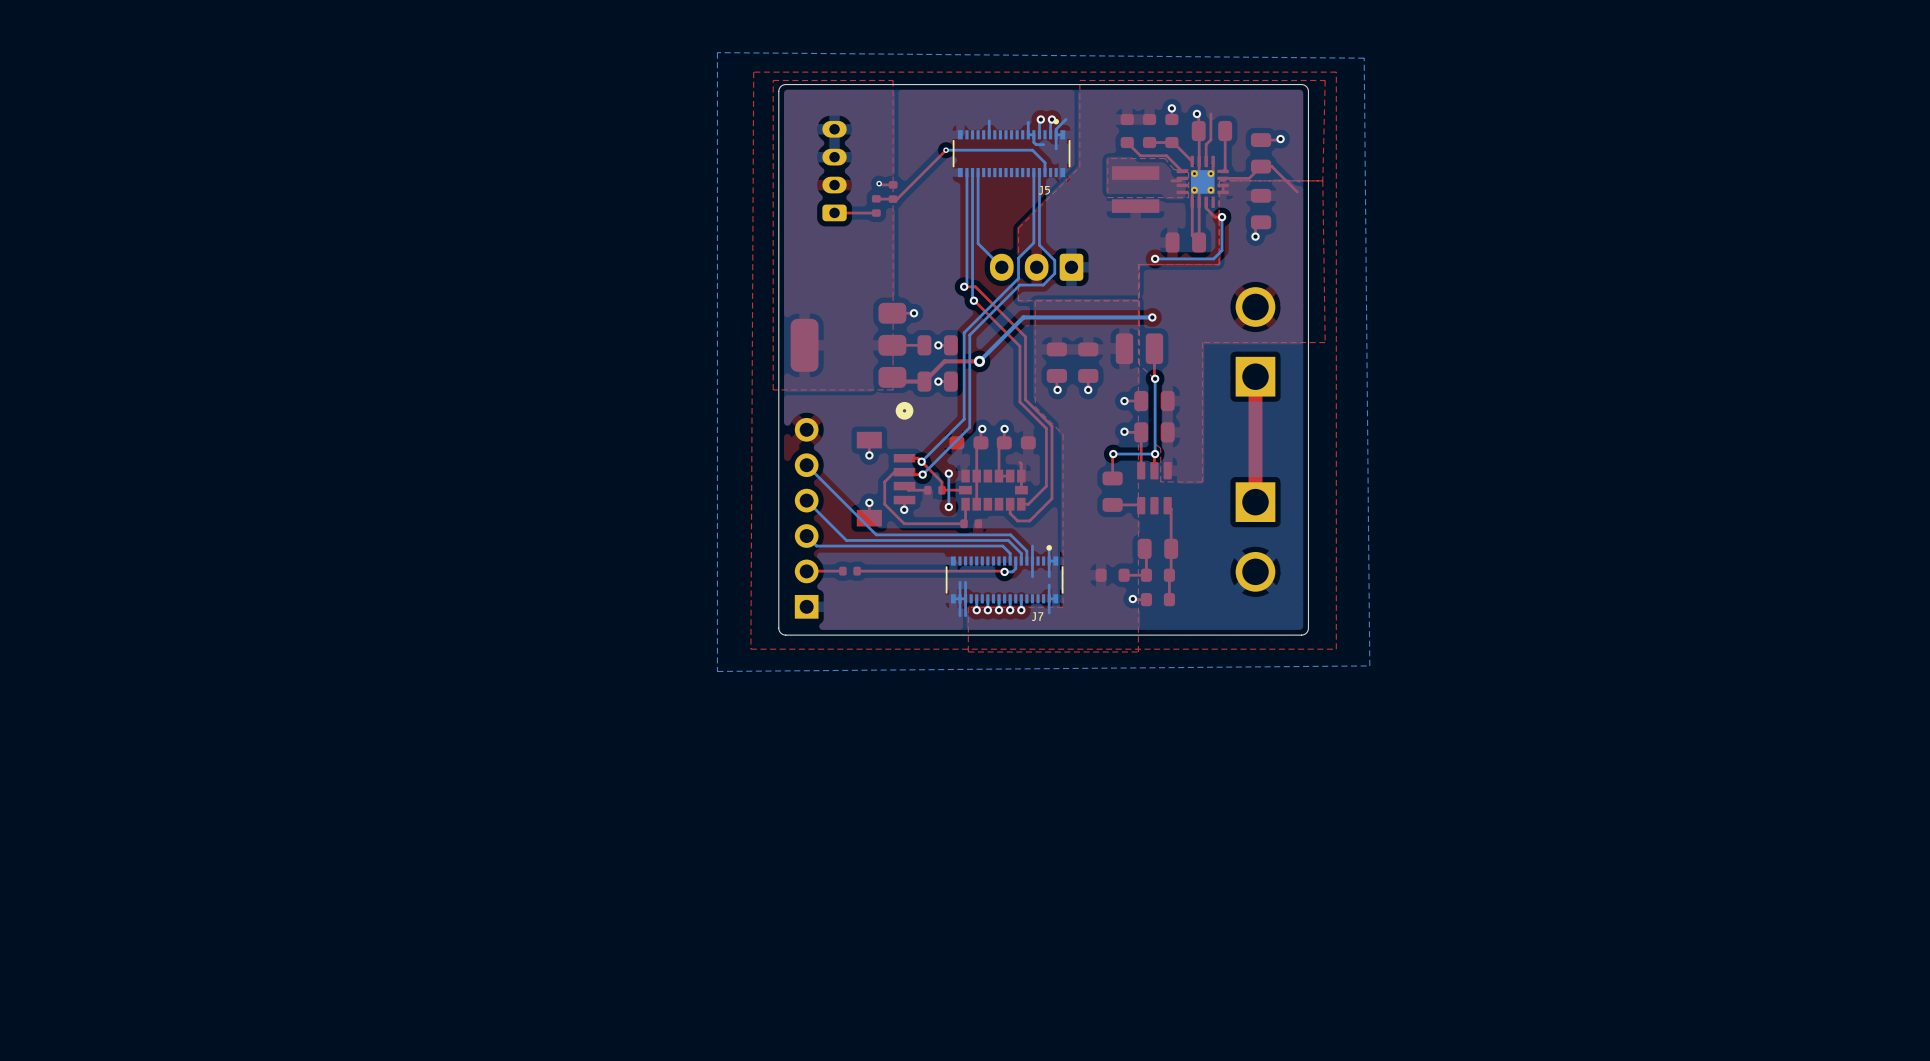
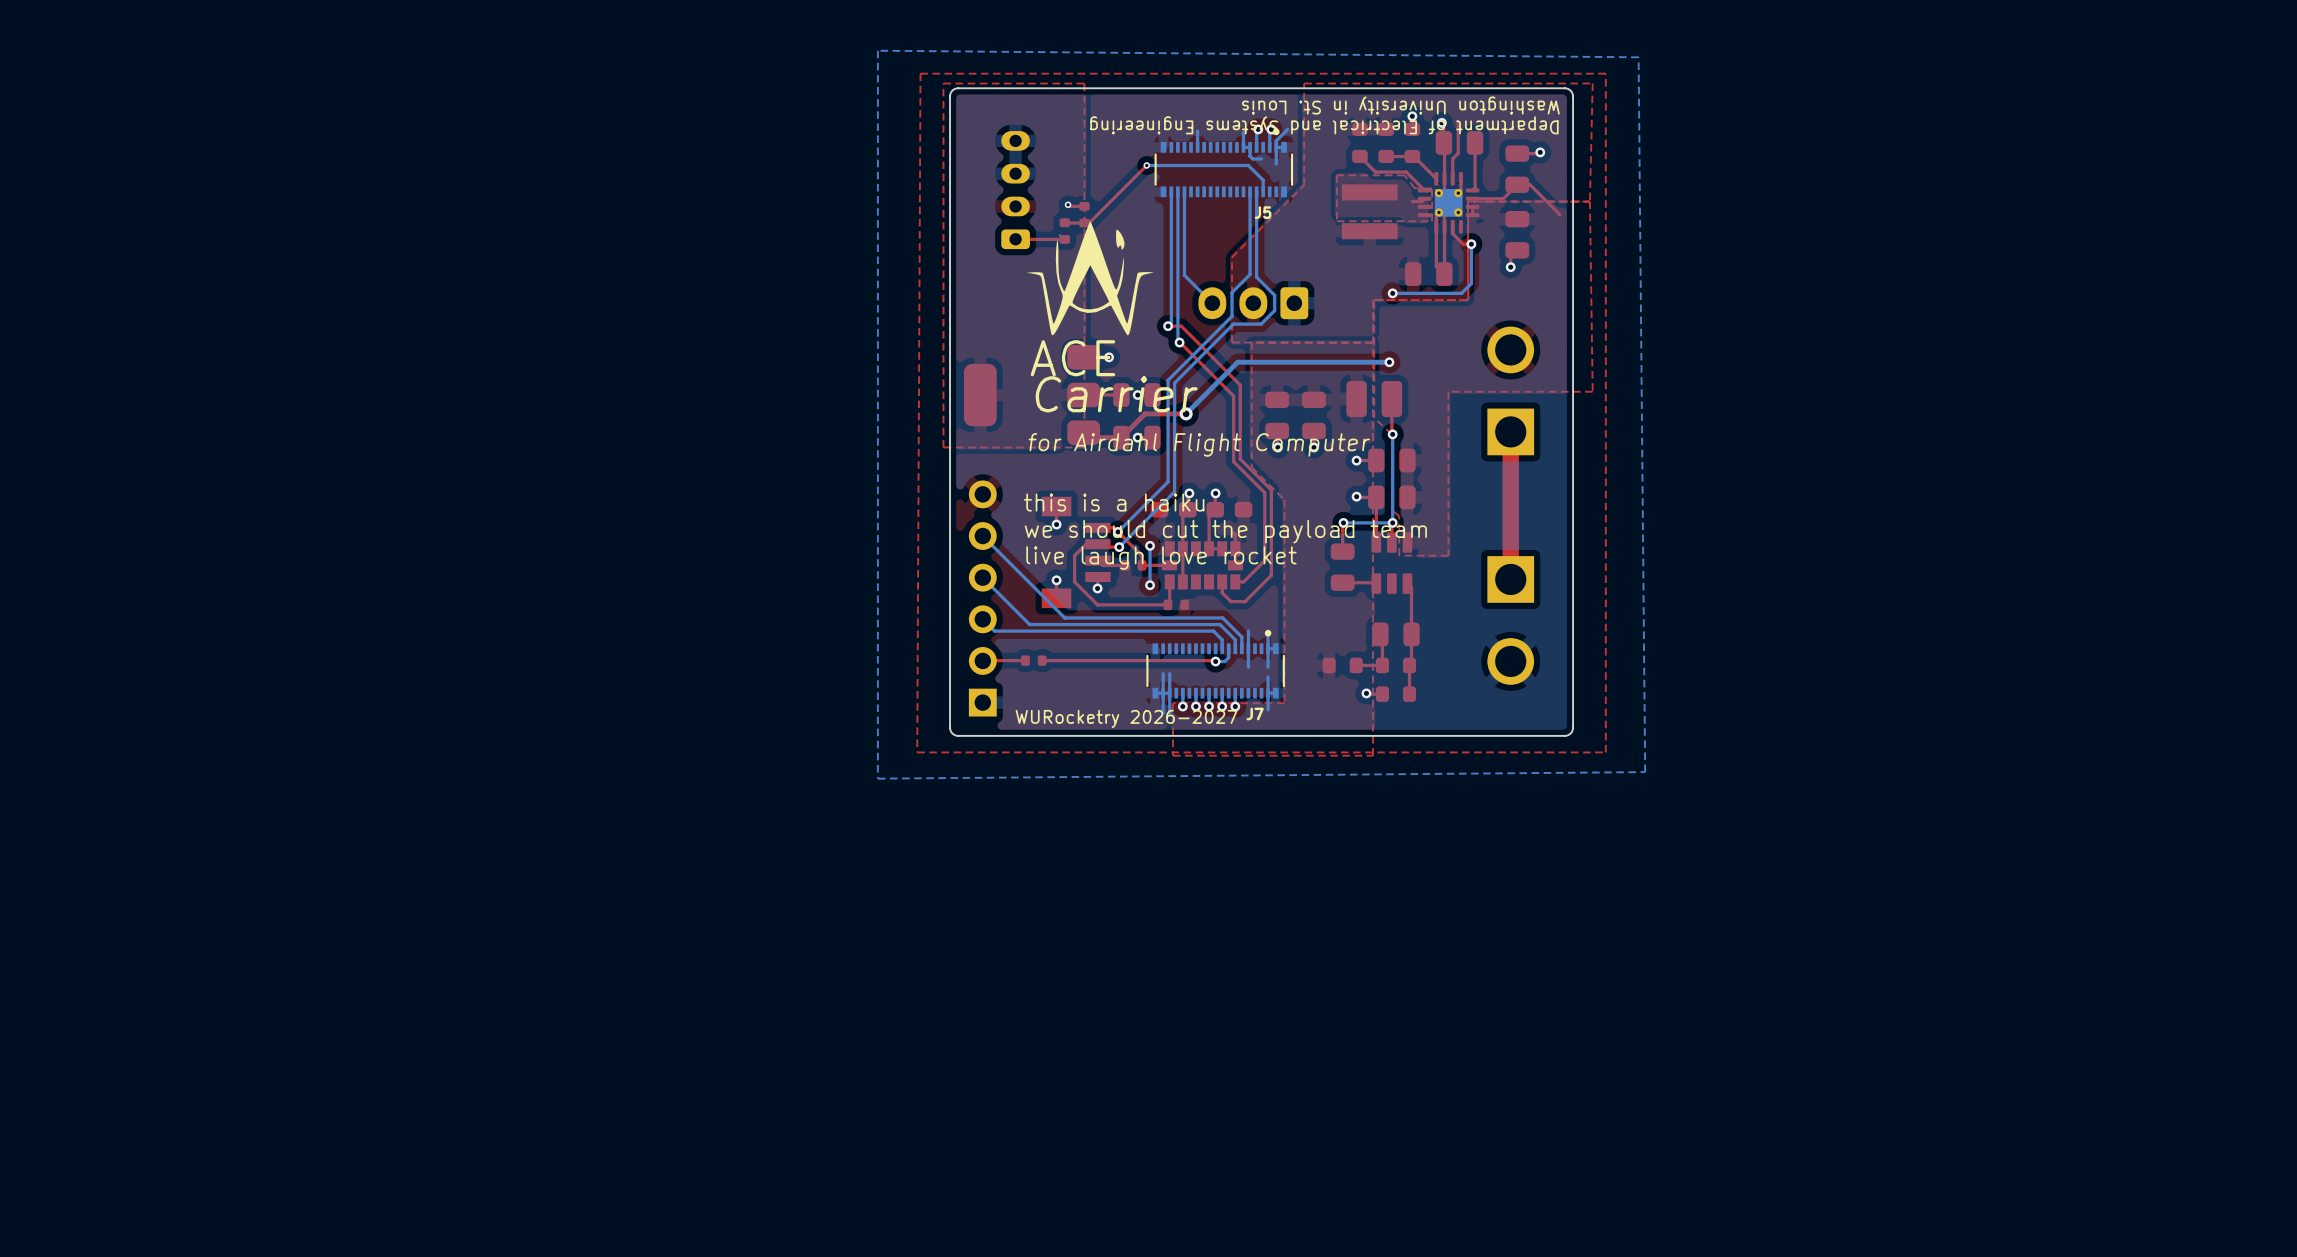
text: none -> Washington University in St. Louis (1400, 105)
text: none -> Department of Electrical and Systems Engineering (1324, 125)
drawing: none -> [1026, 221, 1155, 336]
text: none -> ACE (1072, 358)
text: none -> Carrier (1116, 394)
text: none -> for Airdahl Flight Computer (1199, 444)
text: none -> this is a haiku (1114, 502)
text: none -> we should cut the payload team (1225, 531)
part: (886, 464) -> none
part: none -> (1076, 552)
text: none -> live laugh love rocket (1161, 558)
text: none -> WURocketry 2026-2027 (1126, 718)

